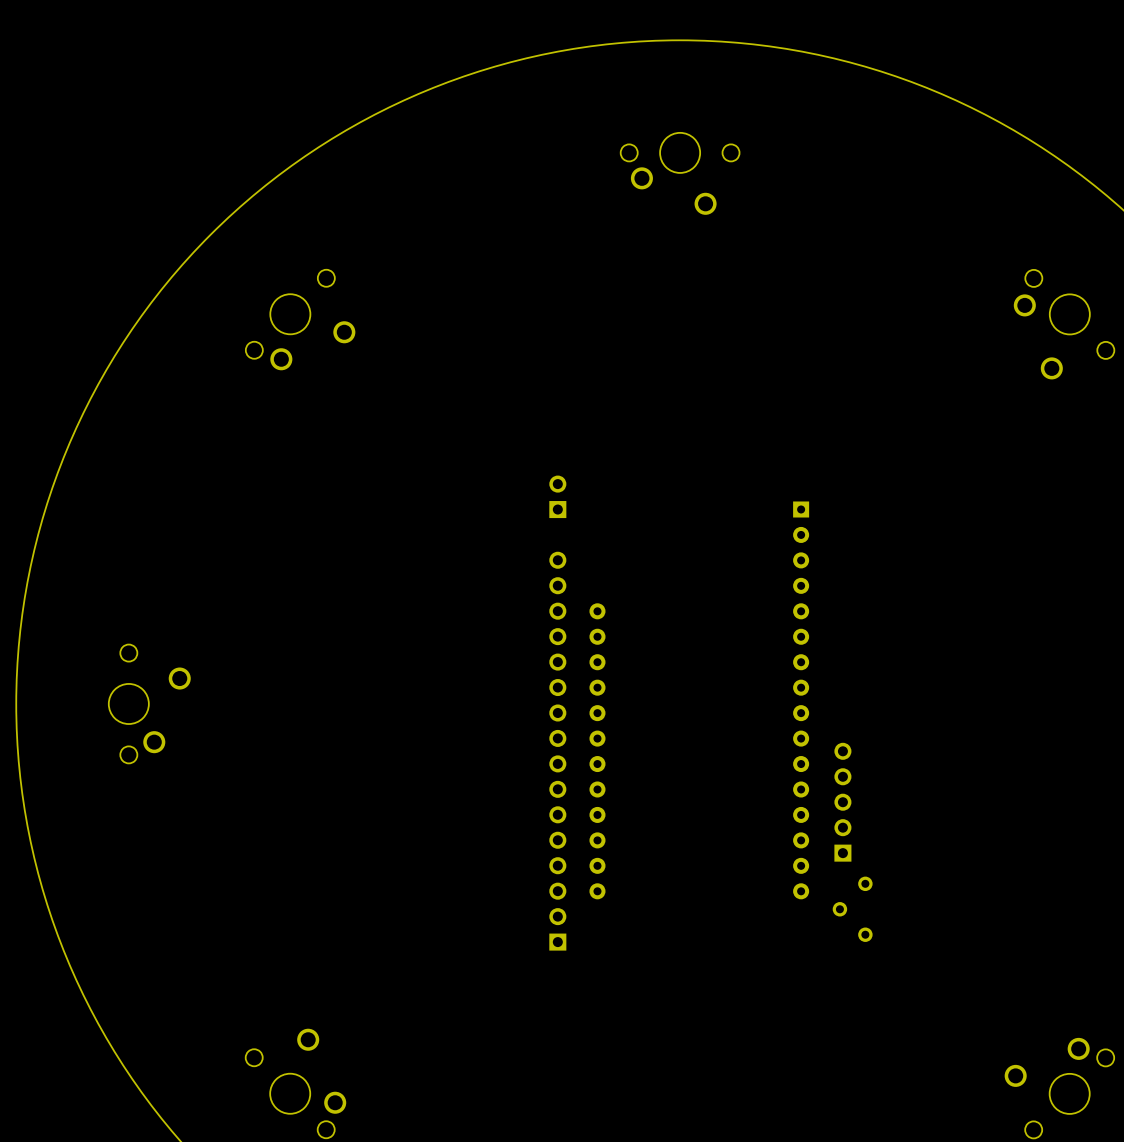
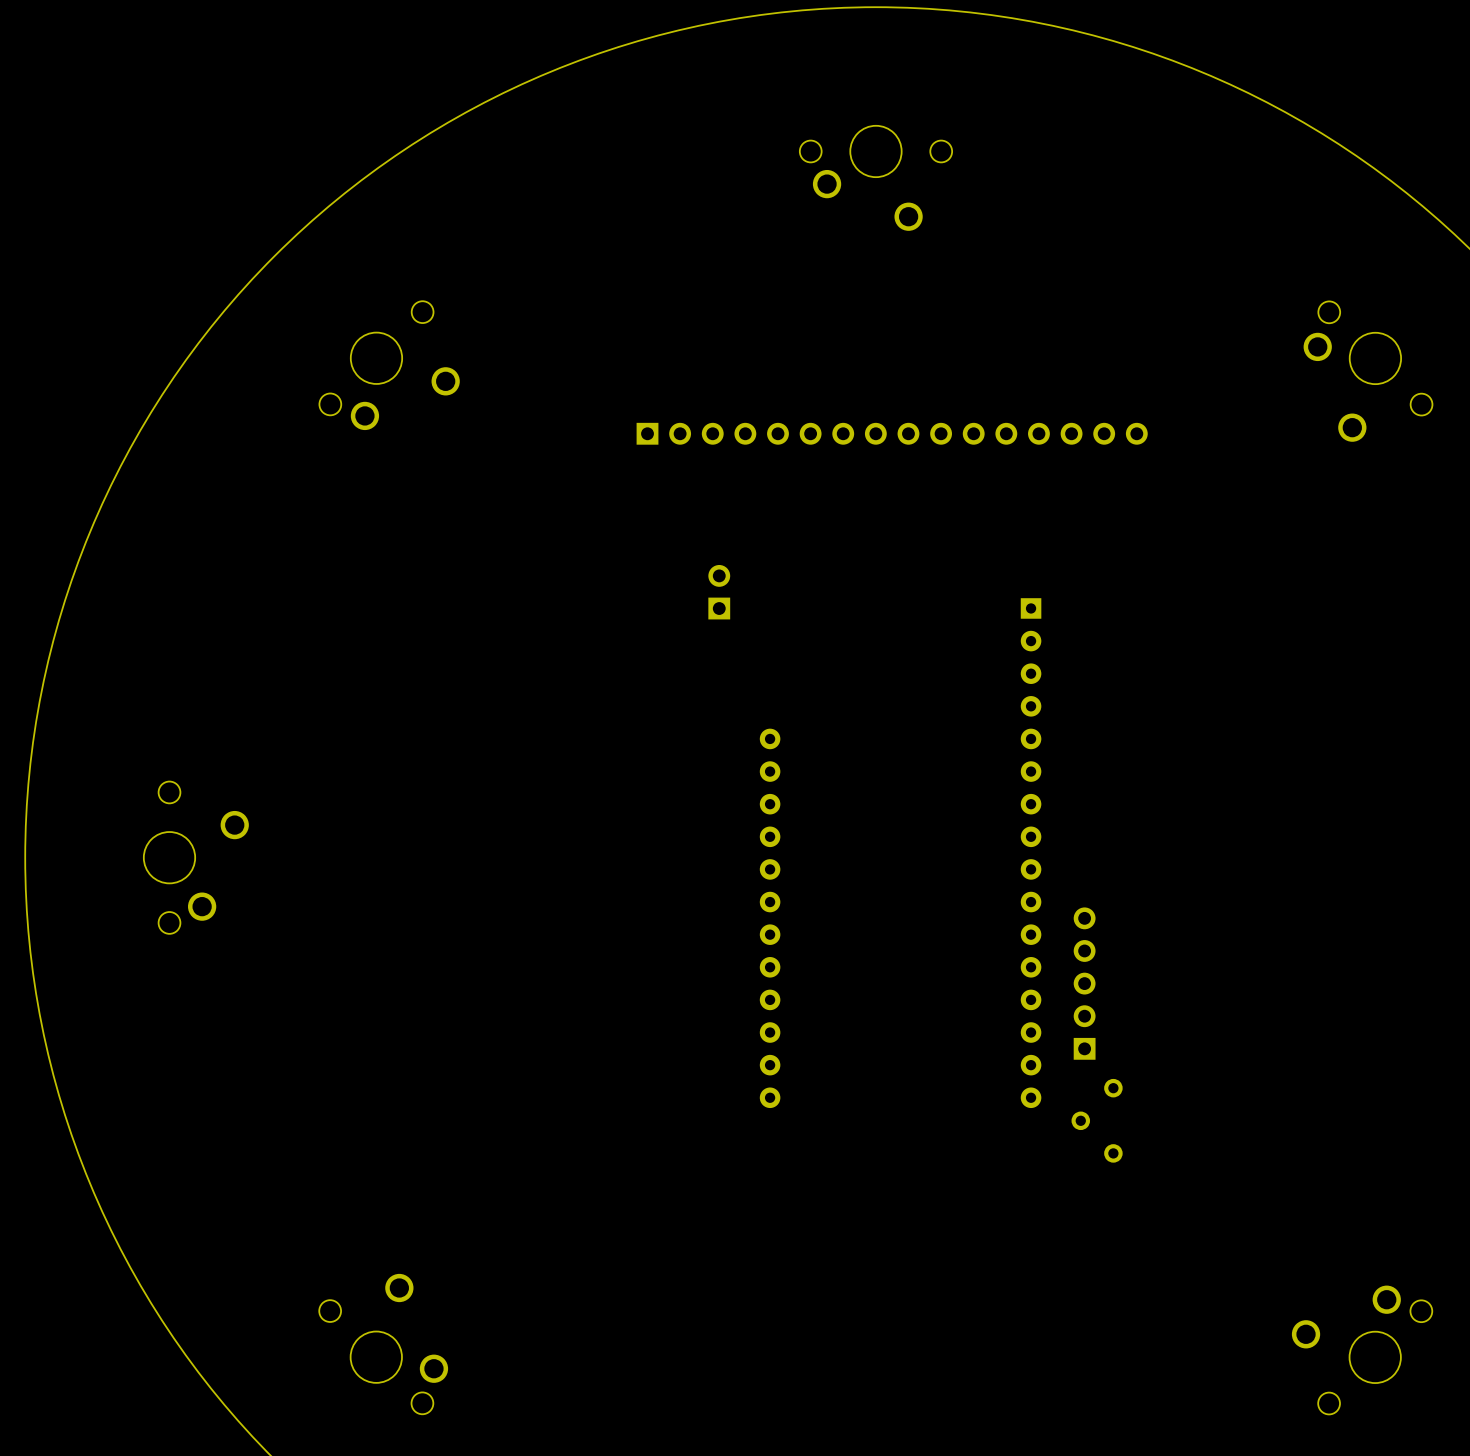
part: none -> (892, 433)
part: (557, 751) -> none

